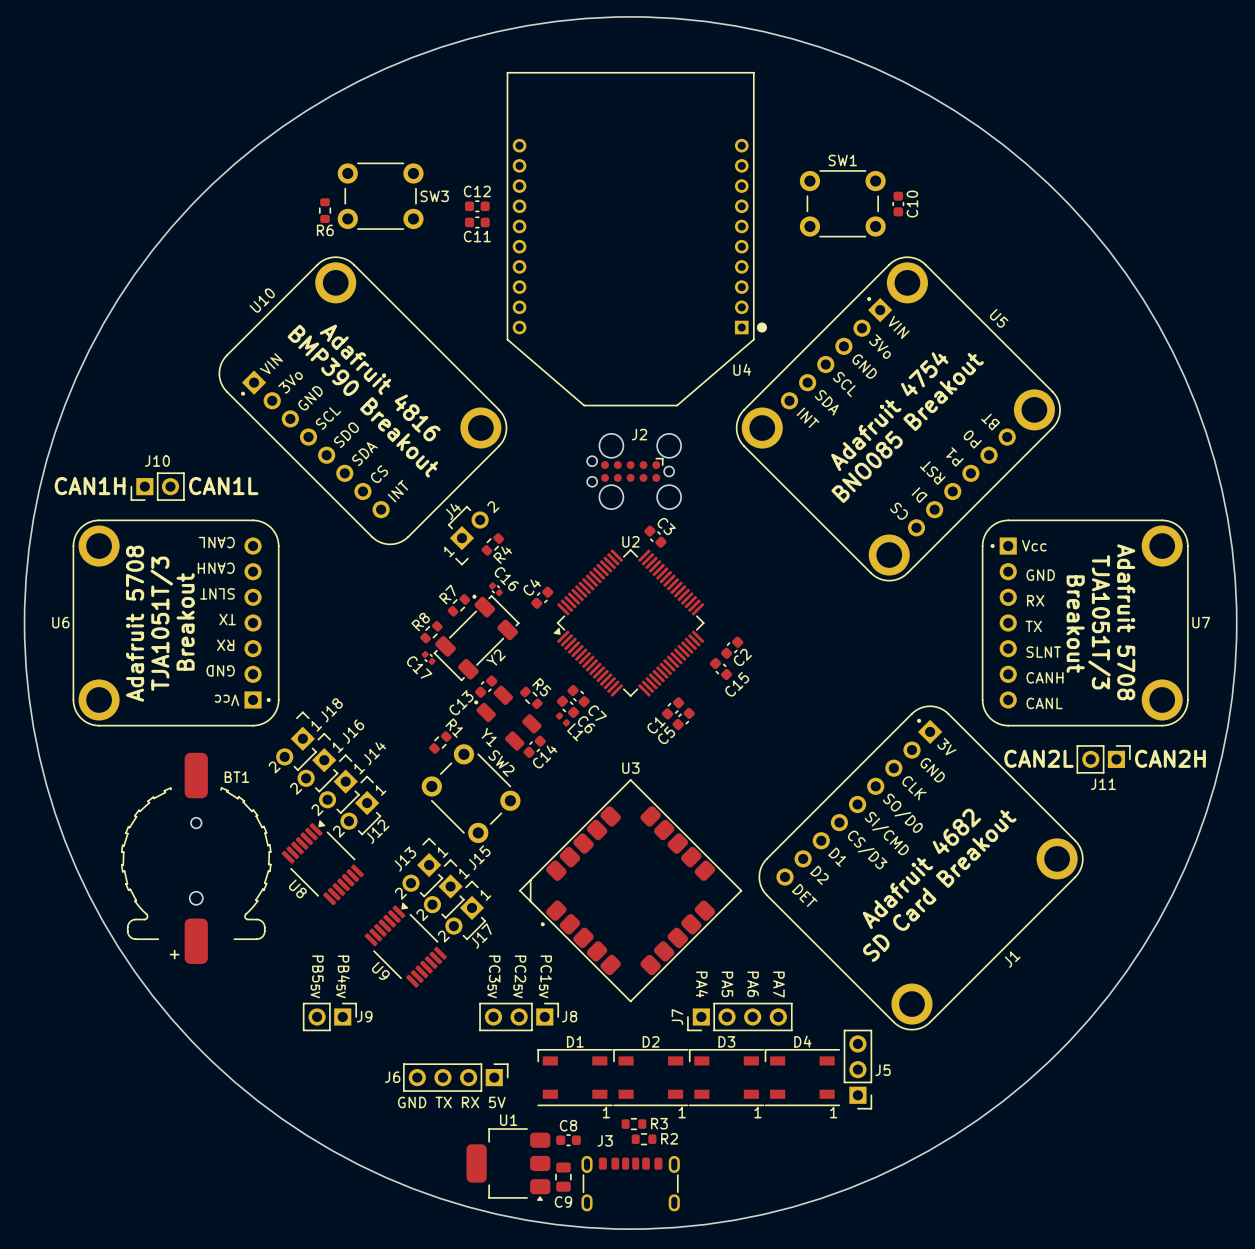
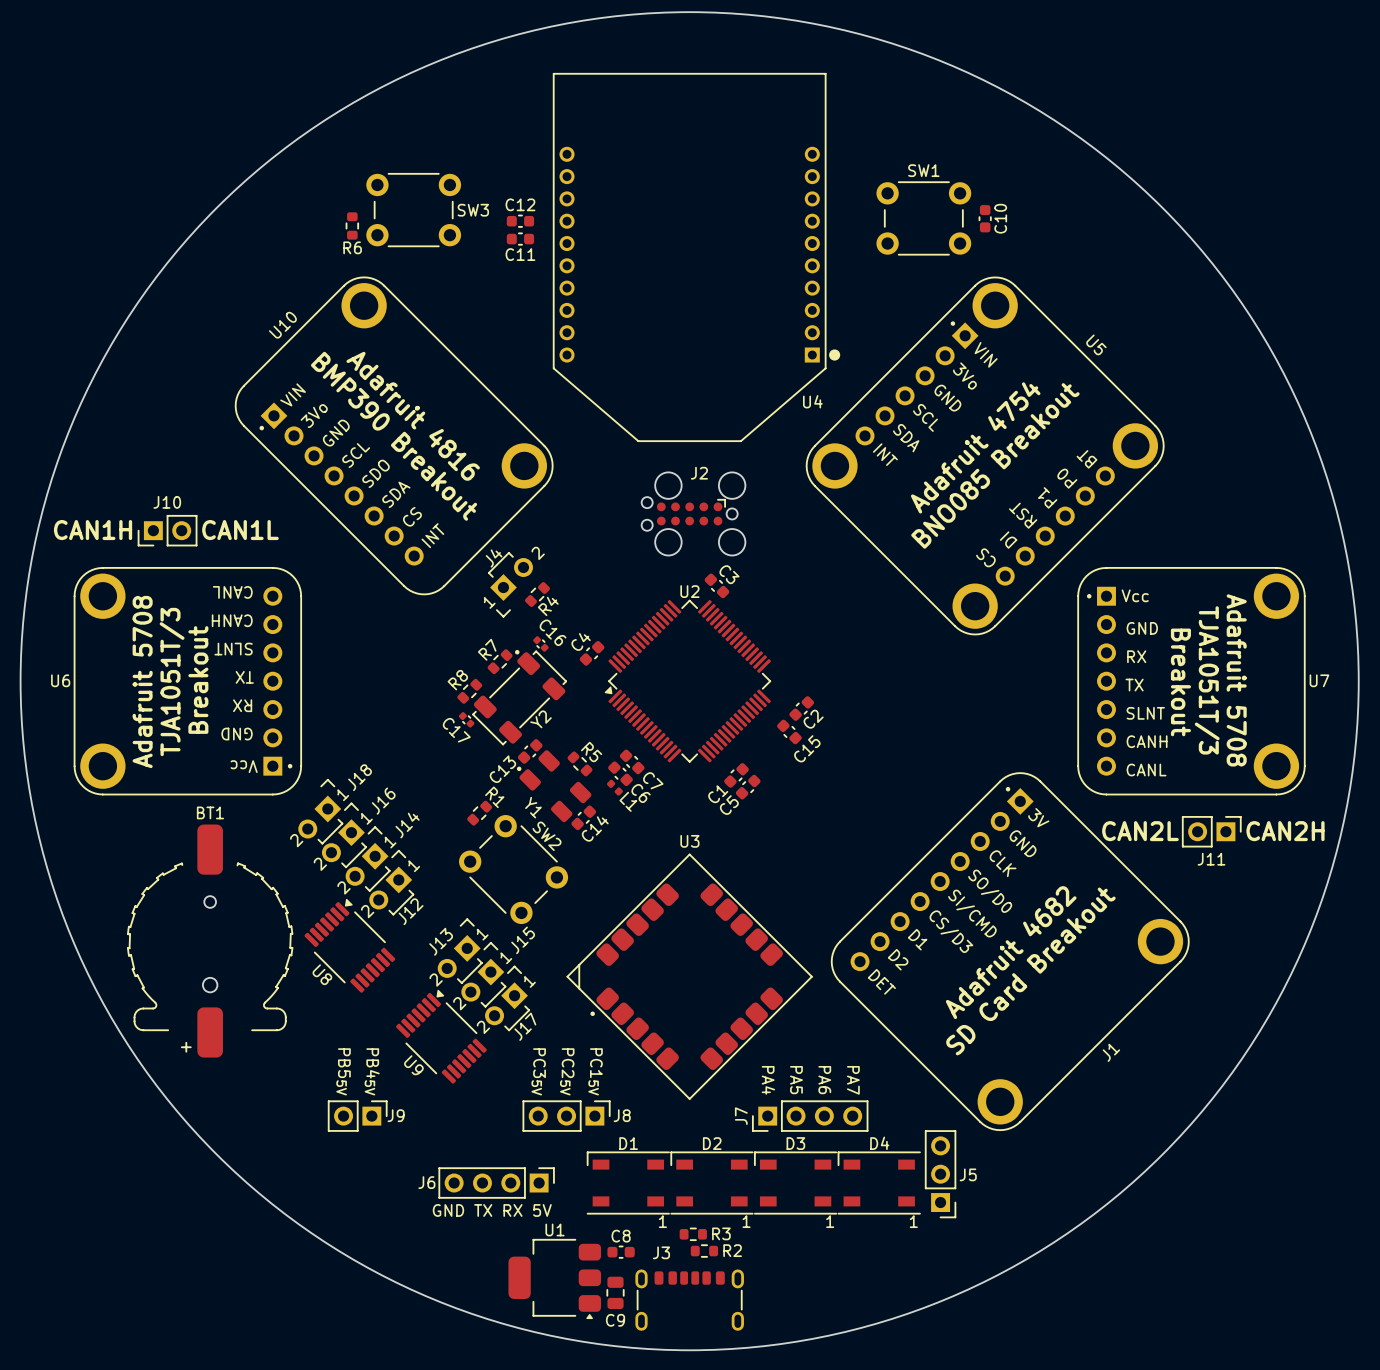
BT1 name position: BT1 (236, 777) -> BT1 (210, 812)

